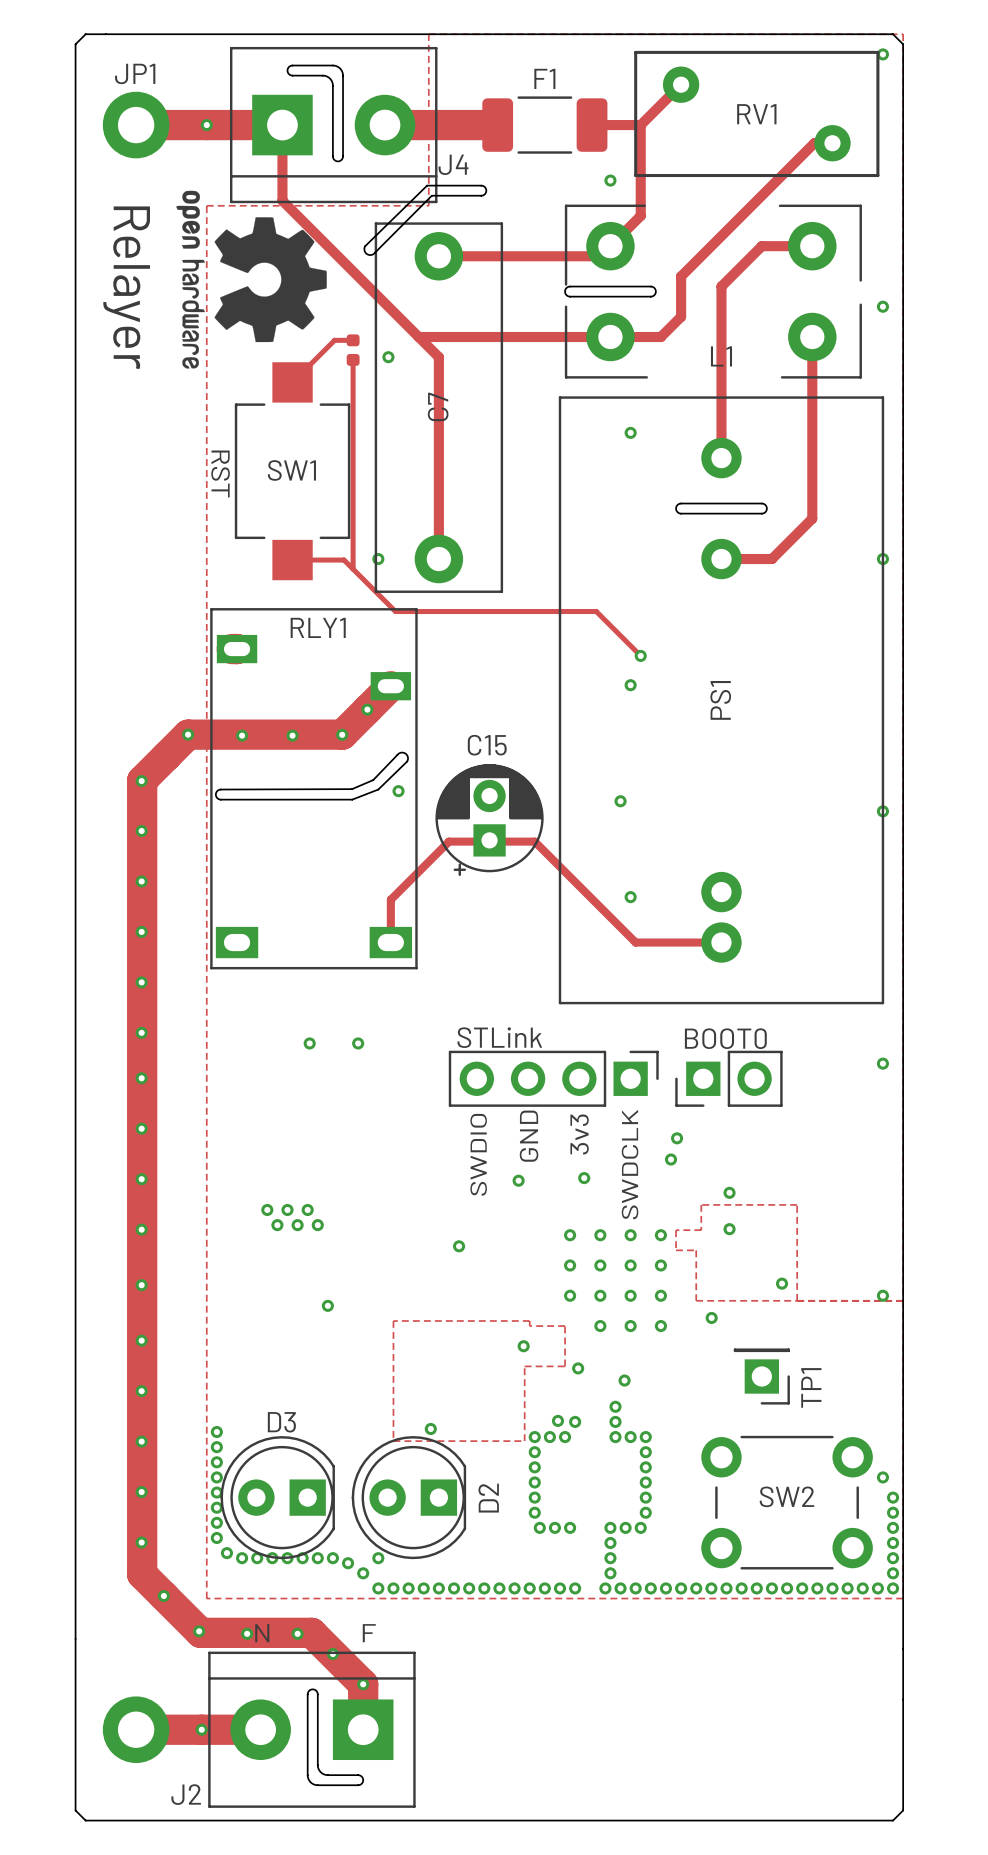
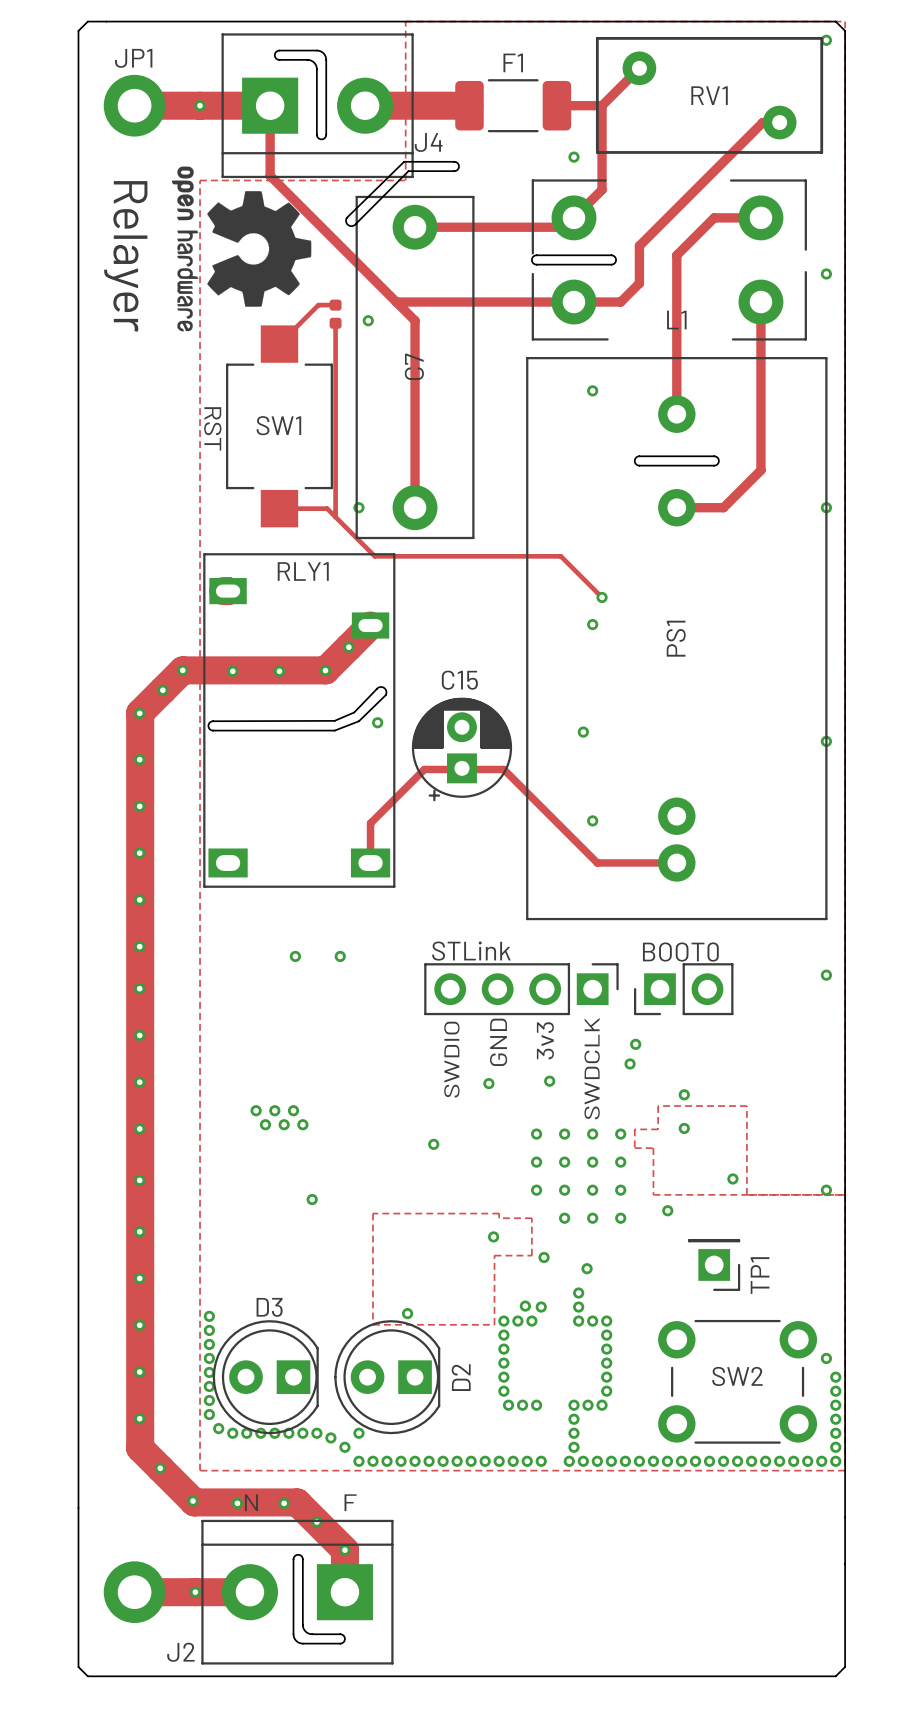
via: none -> (162, 690)

